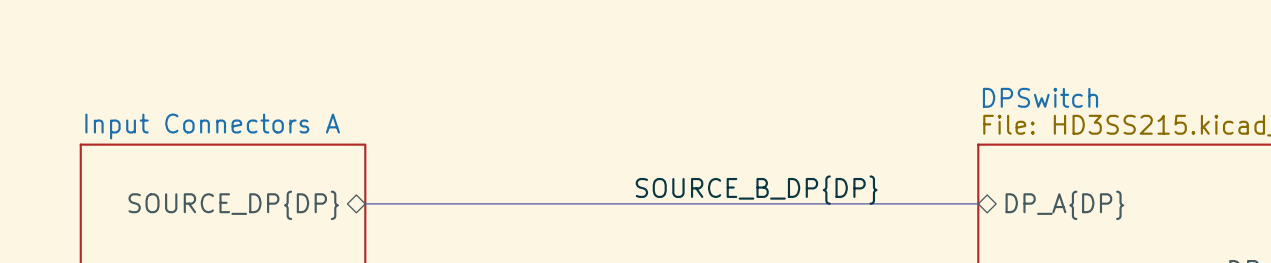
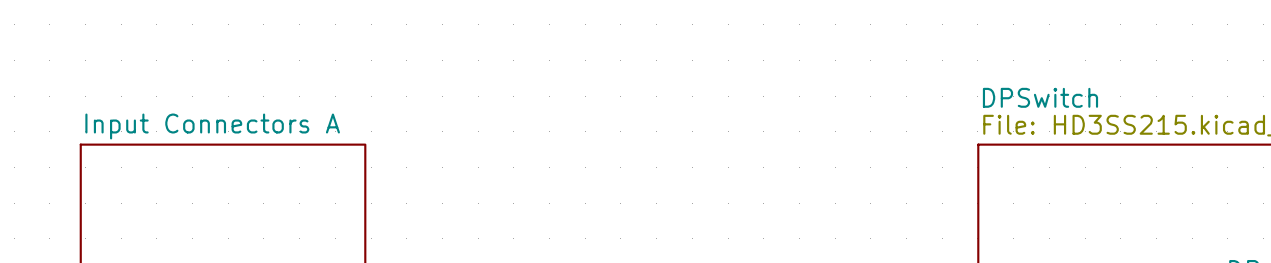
label: SOURCE_B_DP{DP} (756, 190) -> none
bus: (365, 203) (978, 203) -> none
sheet pin: SOURCE_DP{DP} (233, 205) -> none
sheet pin: DP_A{DP} (1064, 205) -> none

